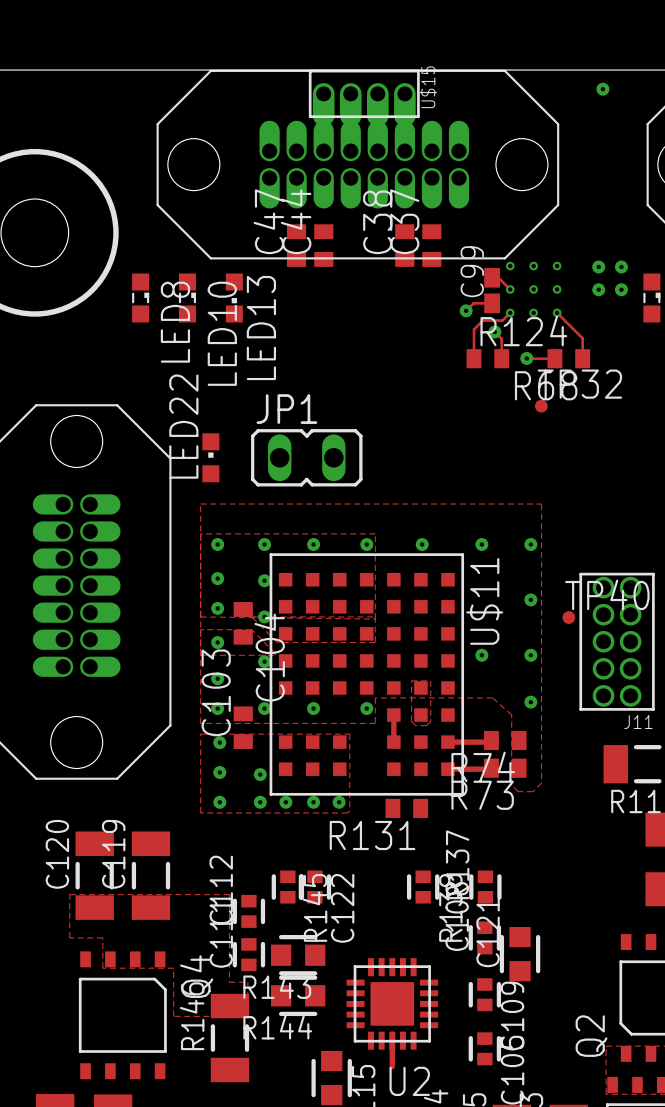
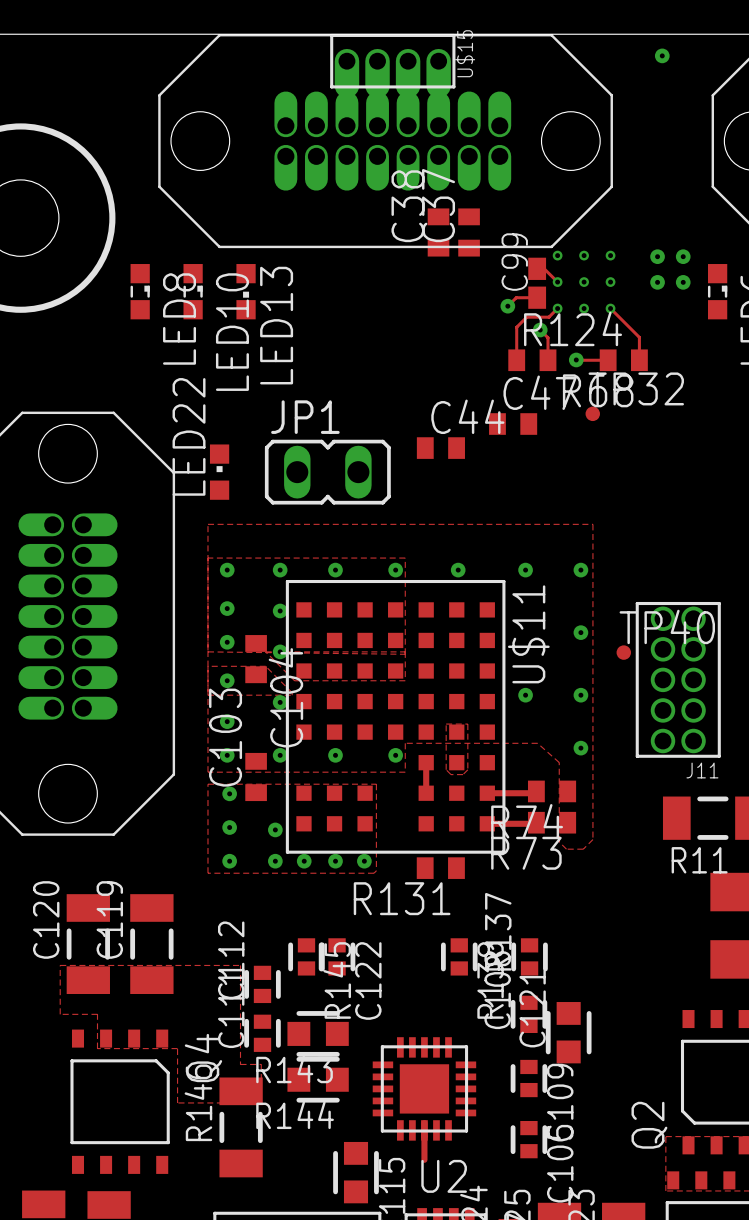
C47 rotation: 0° (296, 245) -> 90° clockwise (513, 424)
C47 position: (296, 245) -> (513, 424)
C44 rotation: 0° (323, 245) -> 90° clockwise (440, 448)
C44 position: (323, 245) -> (440, 448)

